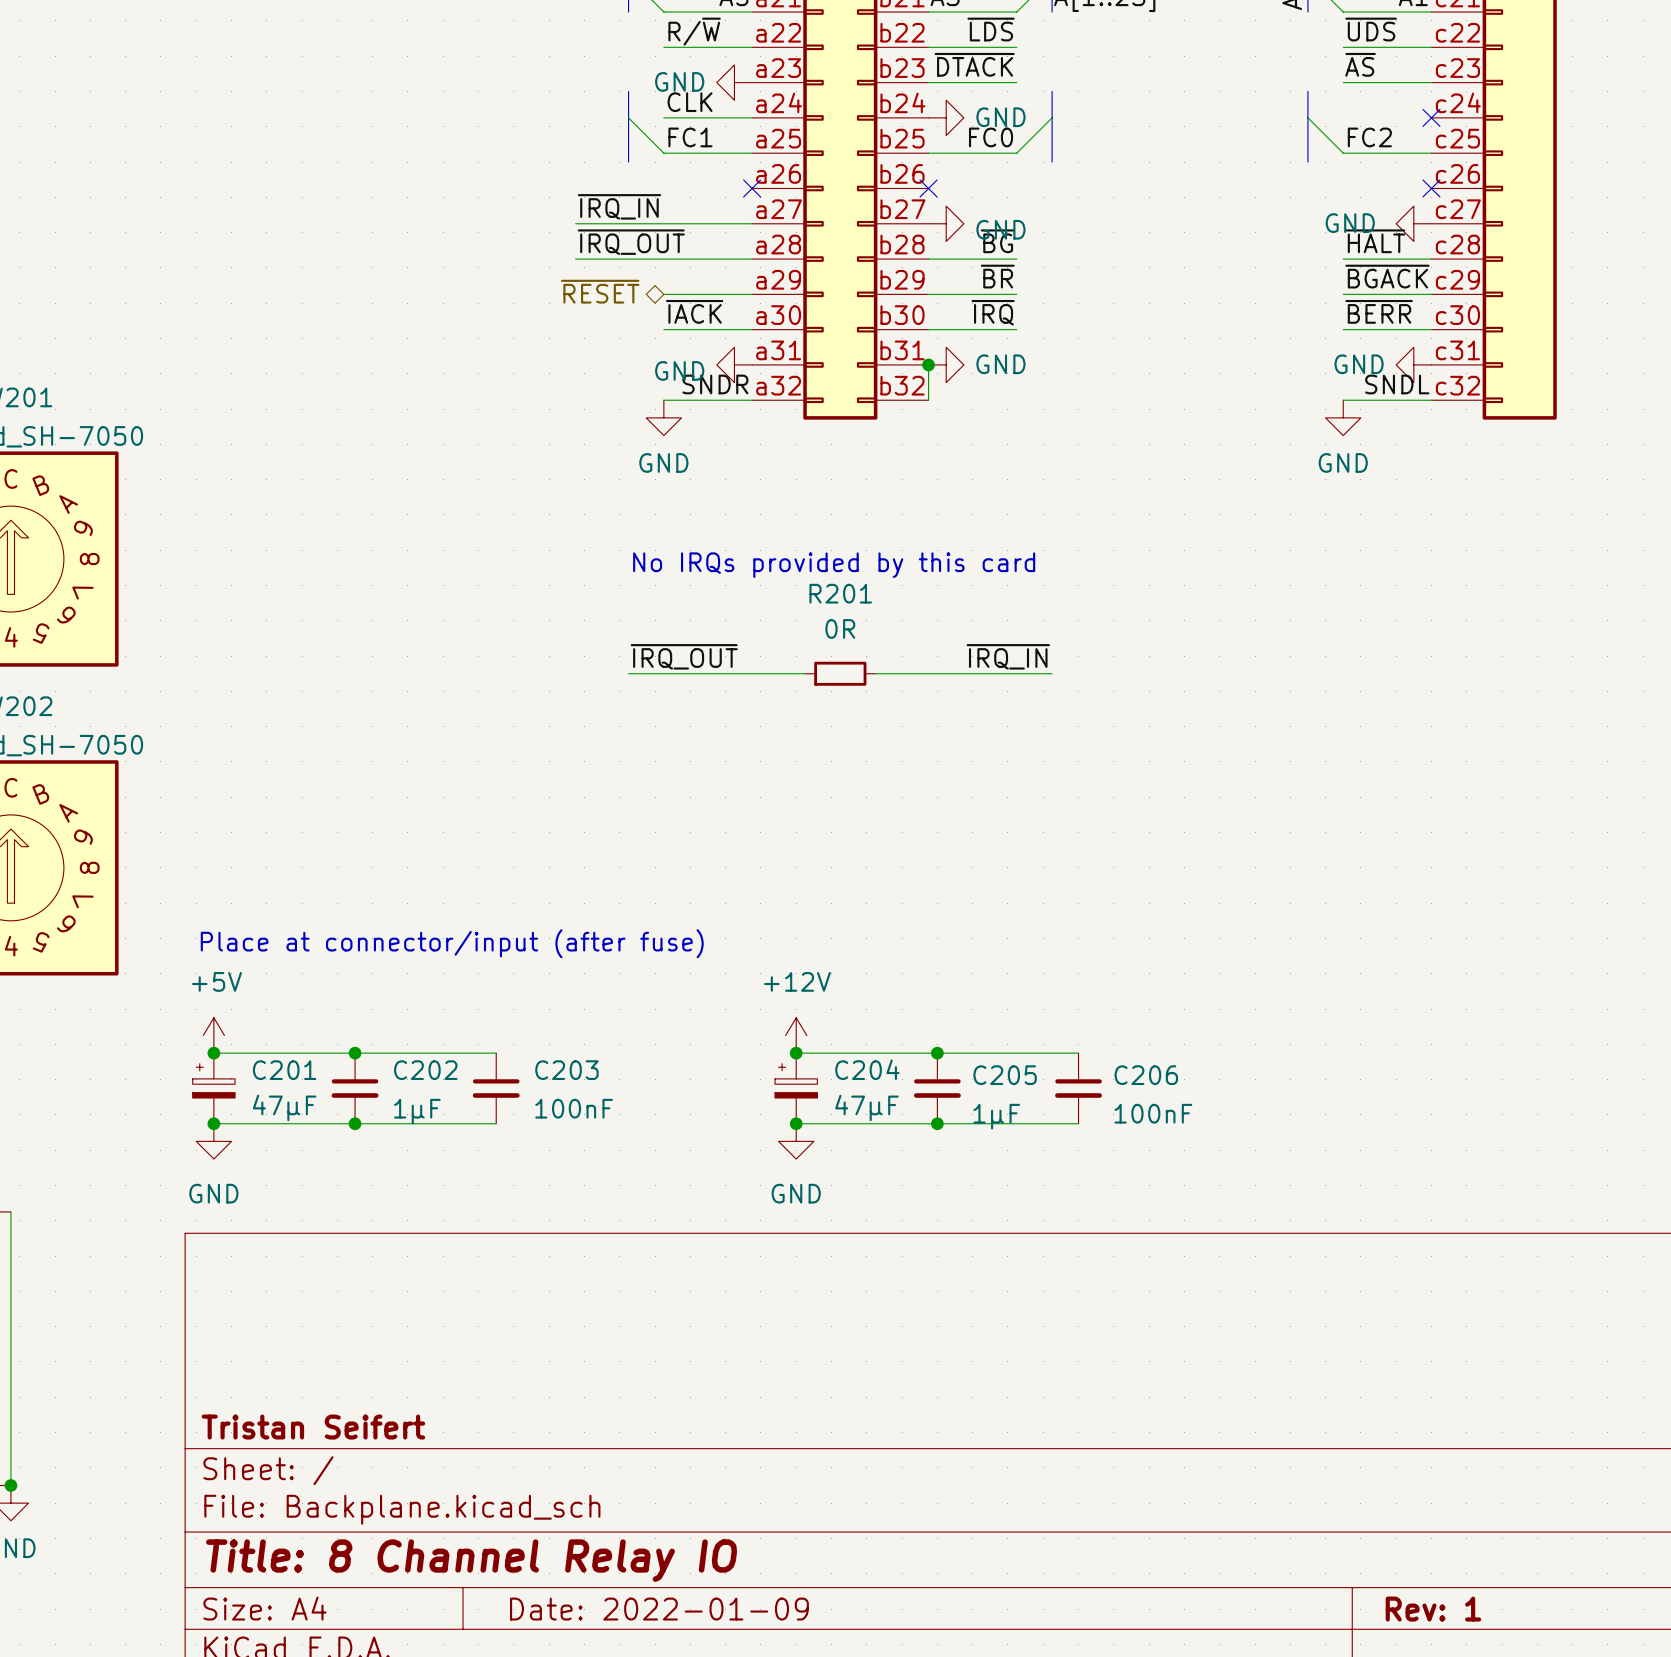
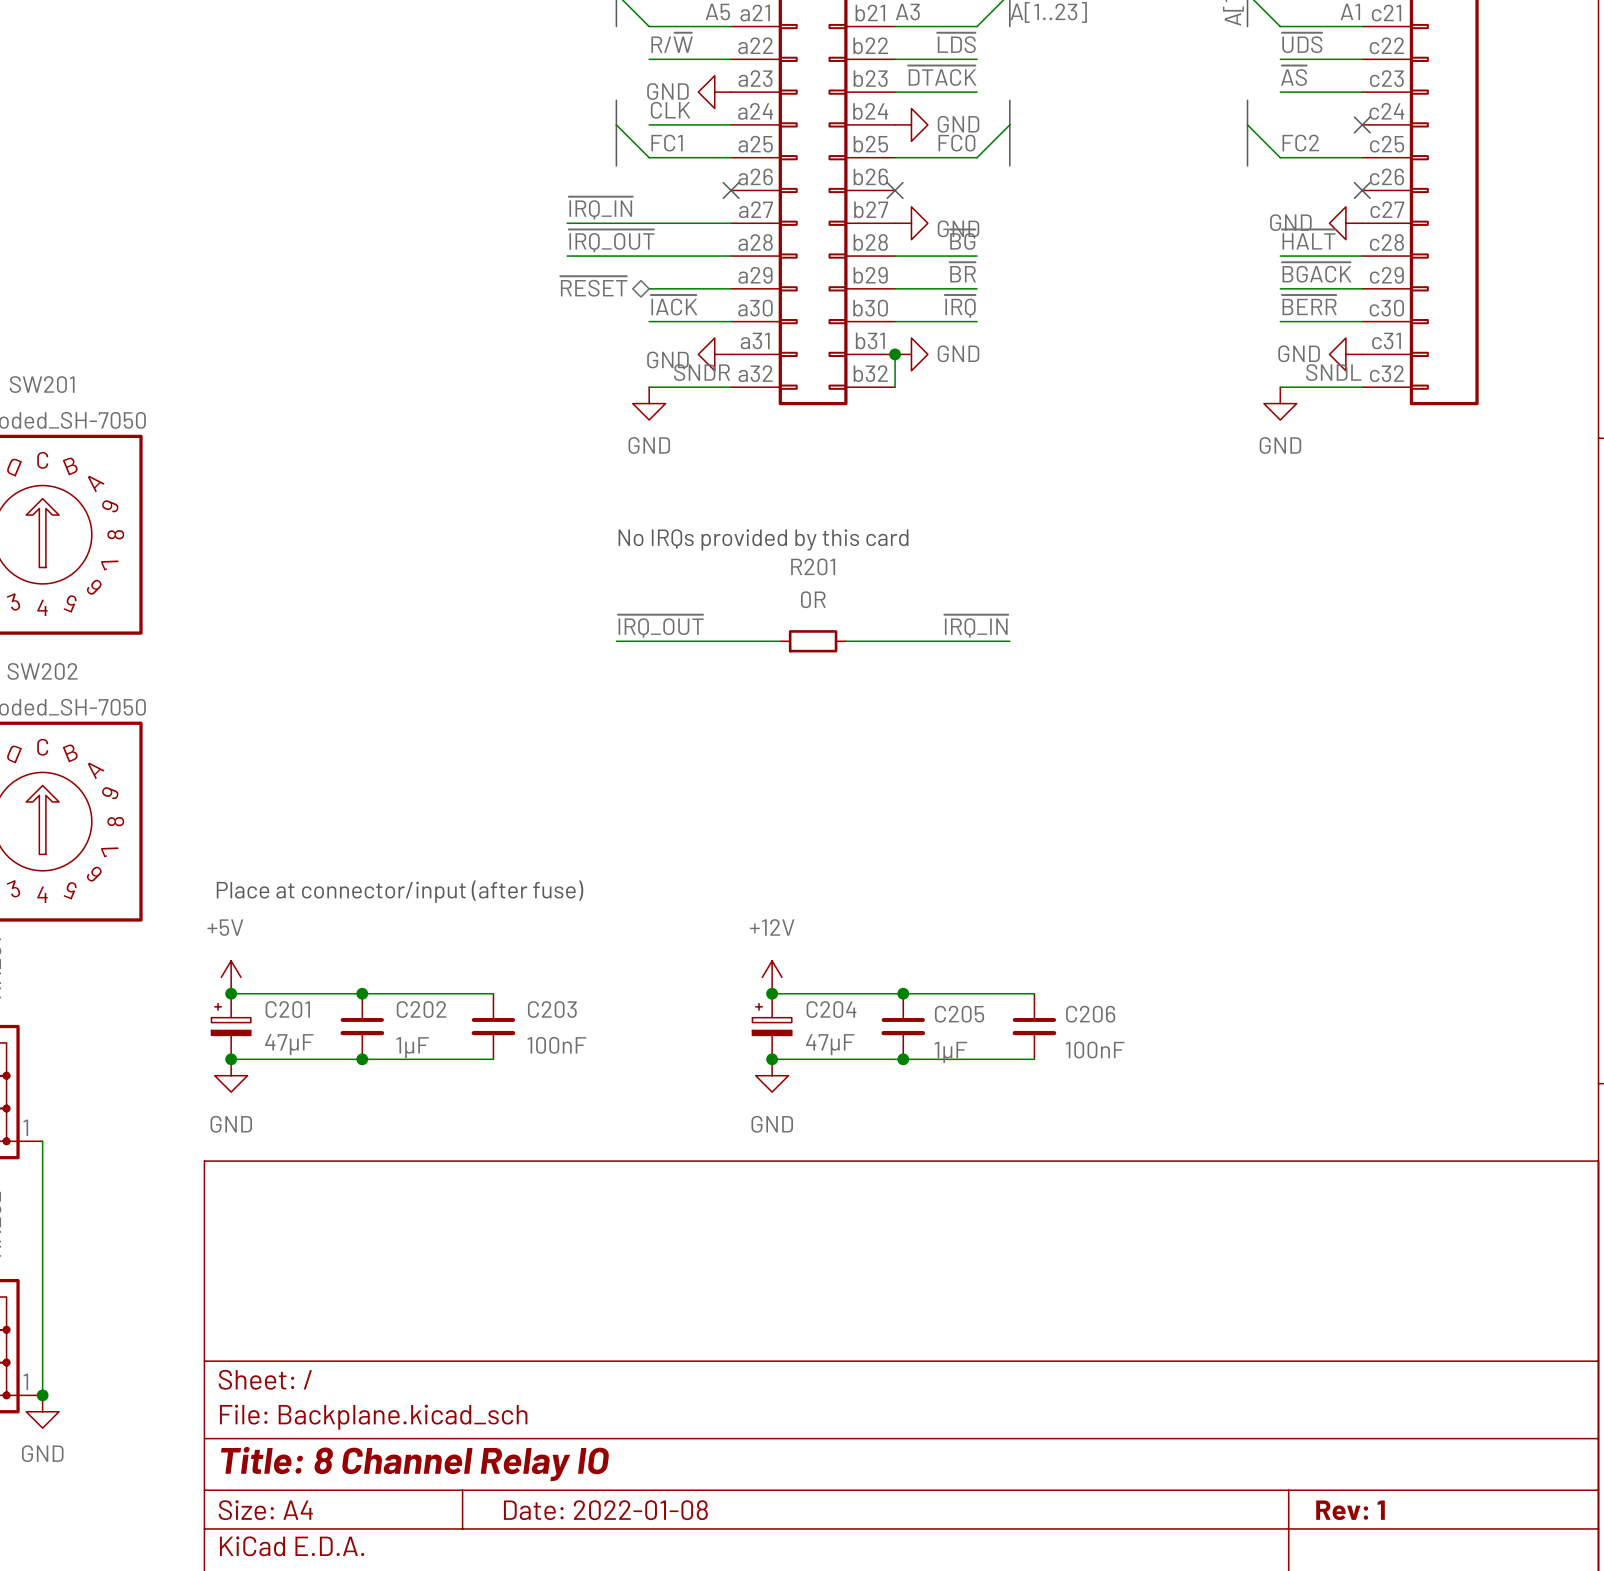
title block: Tristan Seifert (313, 1427) -> none
title block: Date: 2022-01-09 (659, 1609) -> Date: 2022-01-08 (605, 1510)

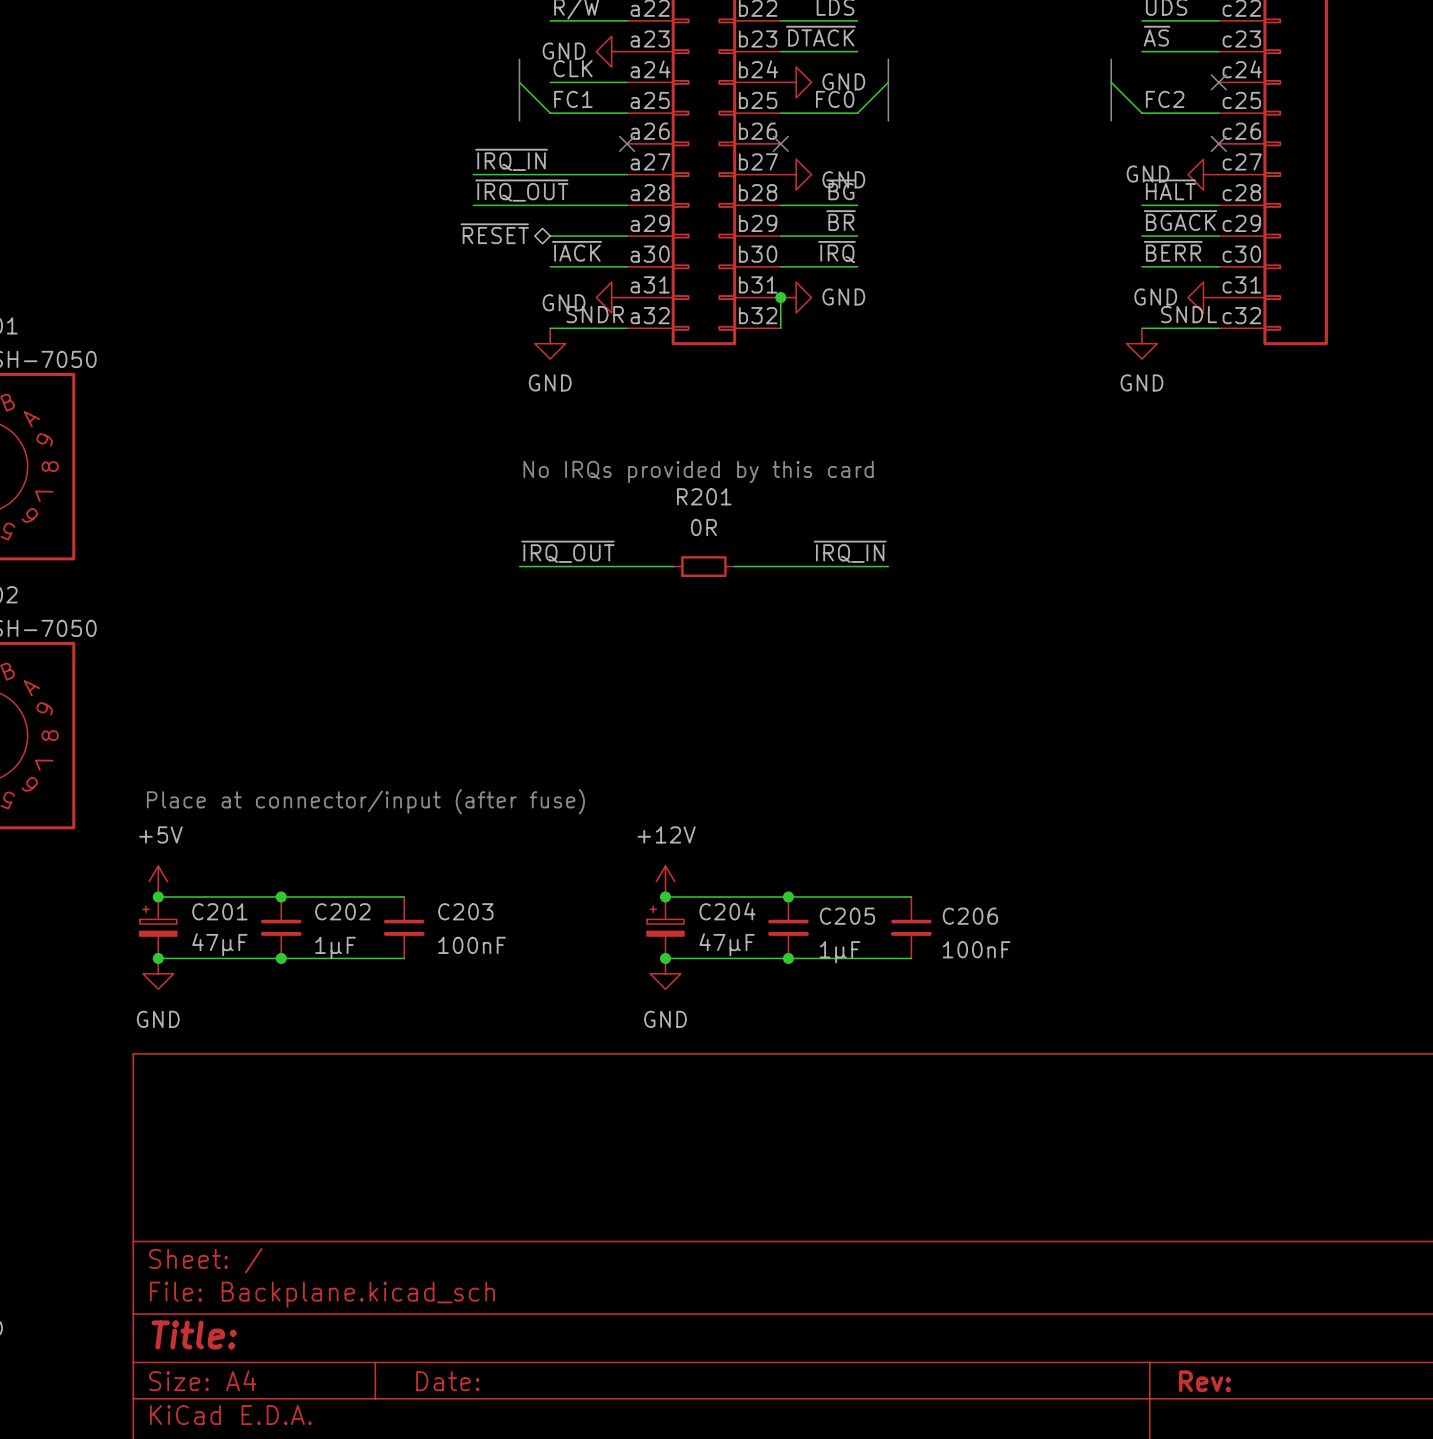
title block: Title: 8 Channel Relay IO (415, 1464) -> Title: (194, 1334)
title block: Date: 2022-01-08 (605, 1510) -> Date: (447, 1381)
title block: Rev: 1 (1350, 1510) -> Rev: (1204, 1381)

